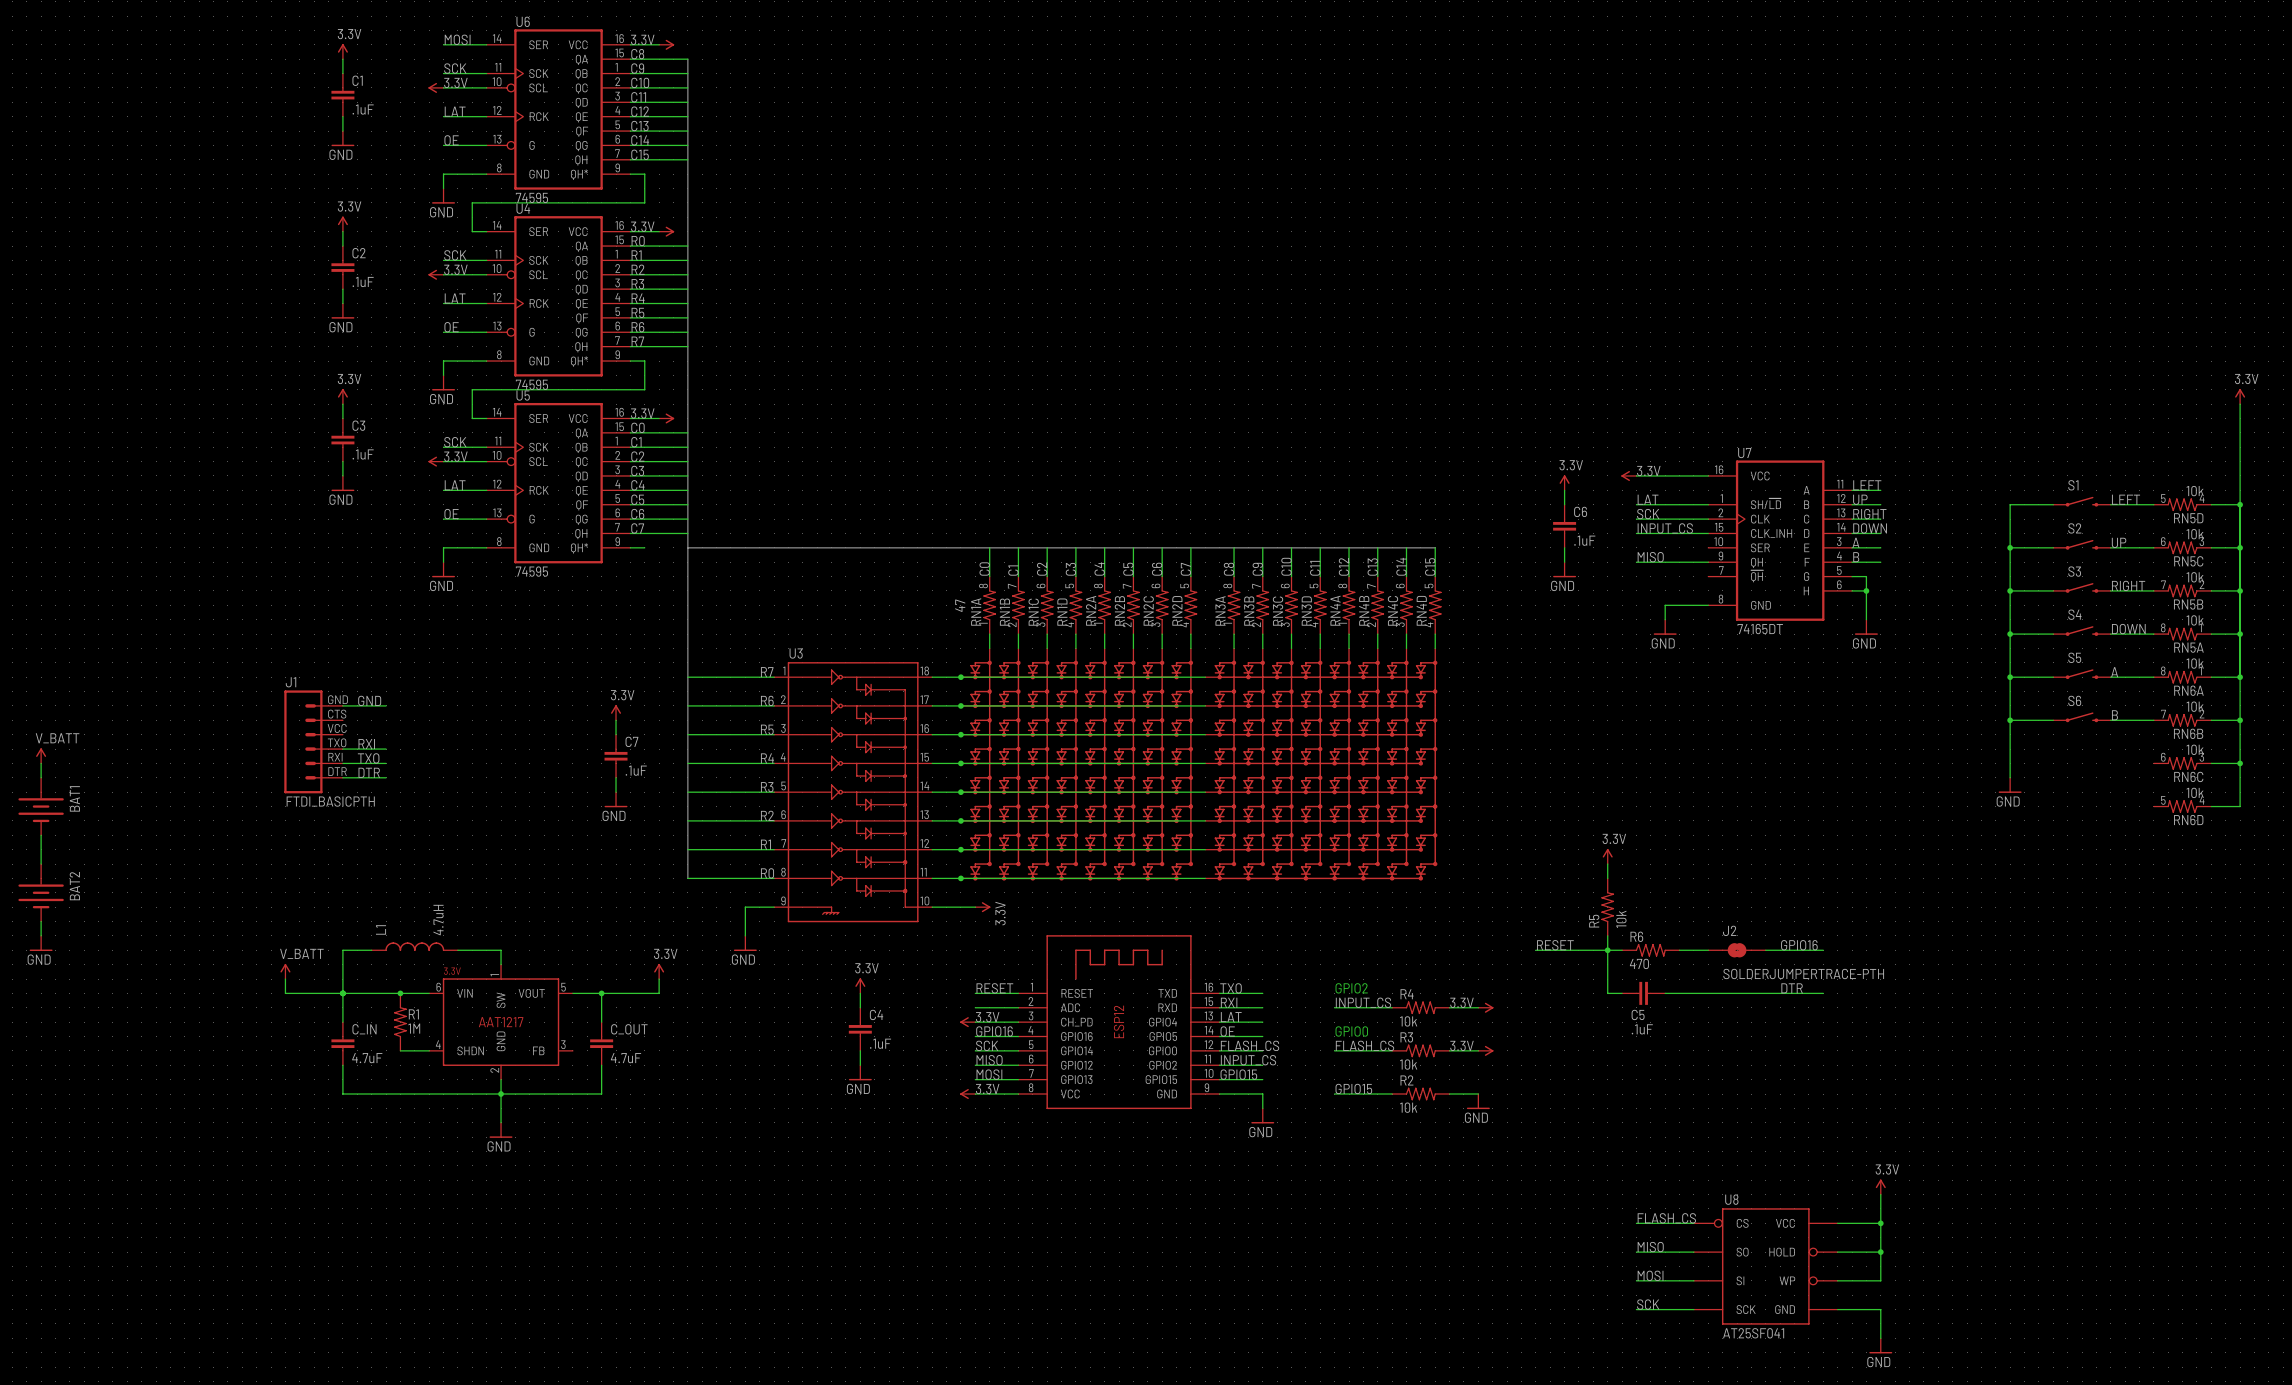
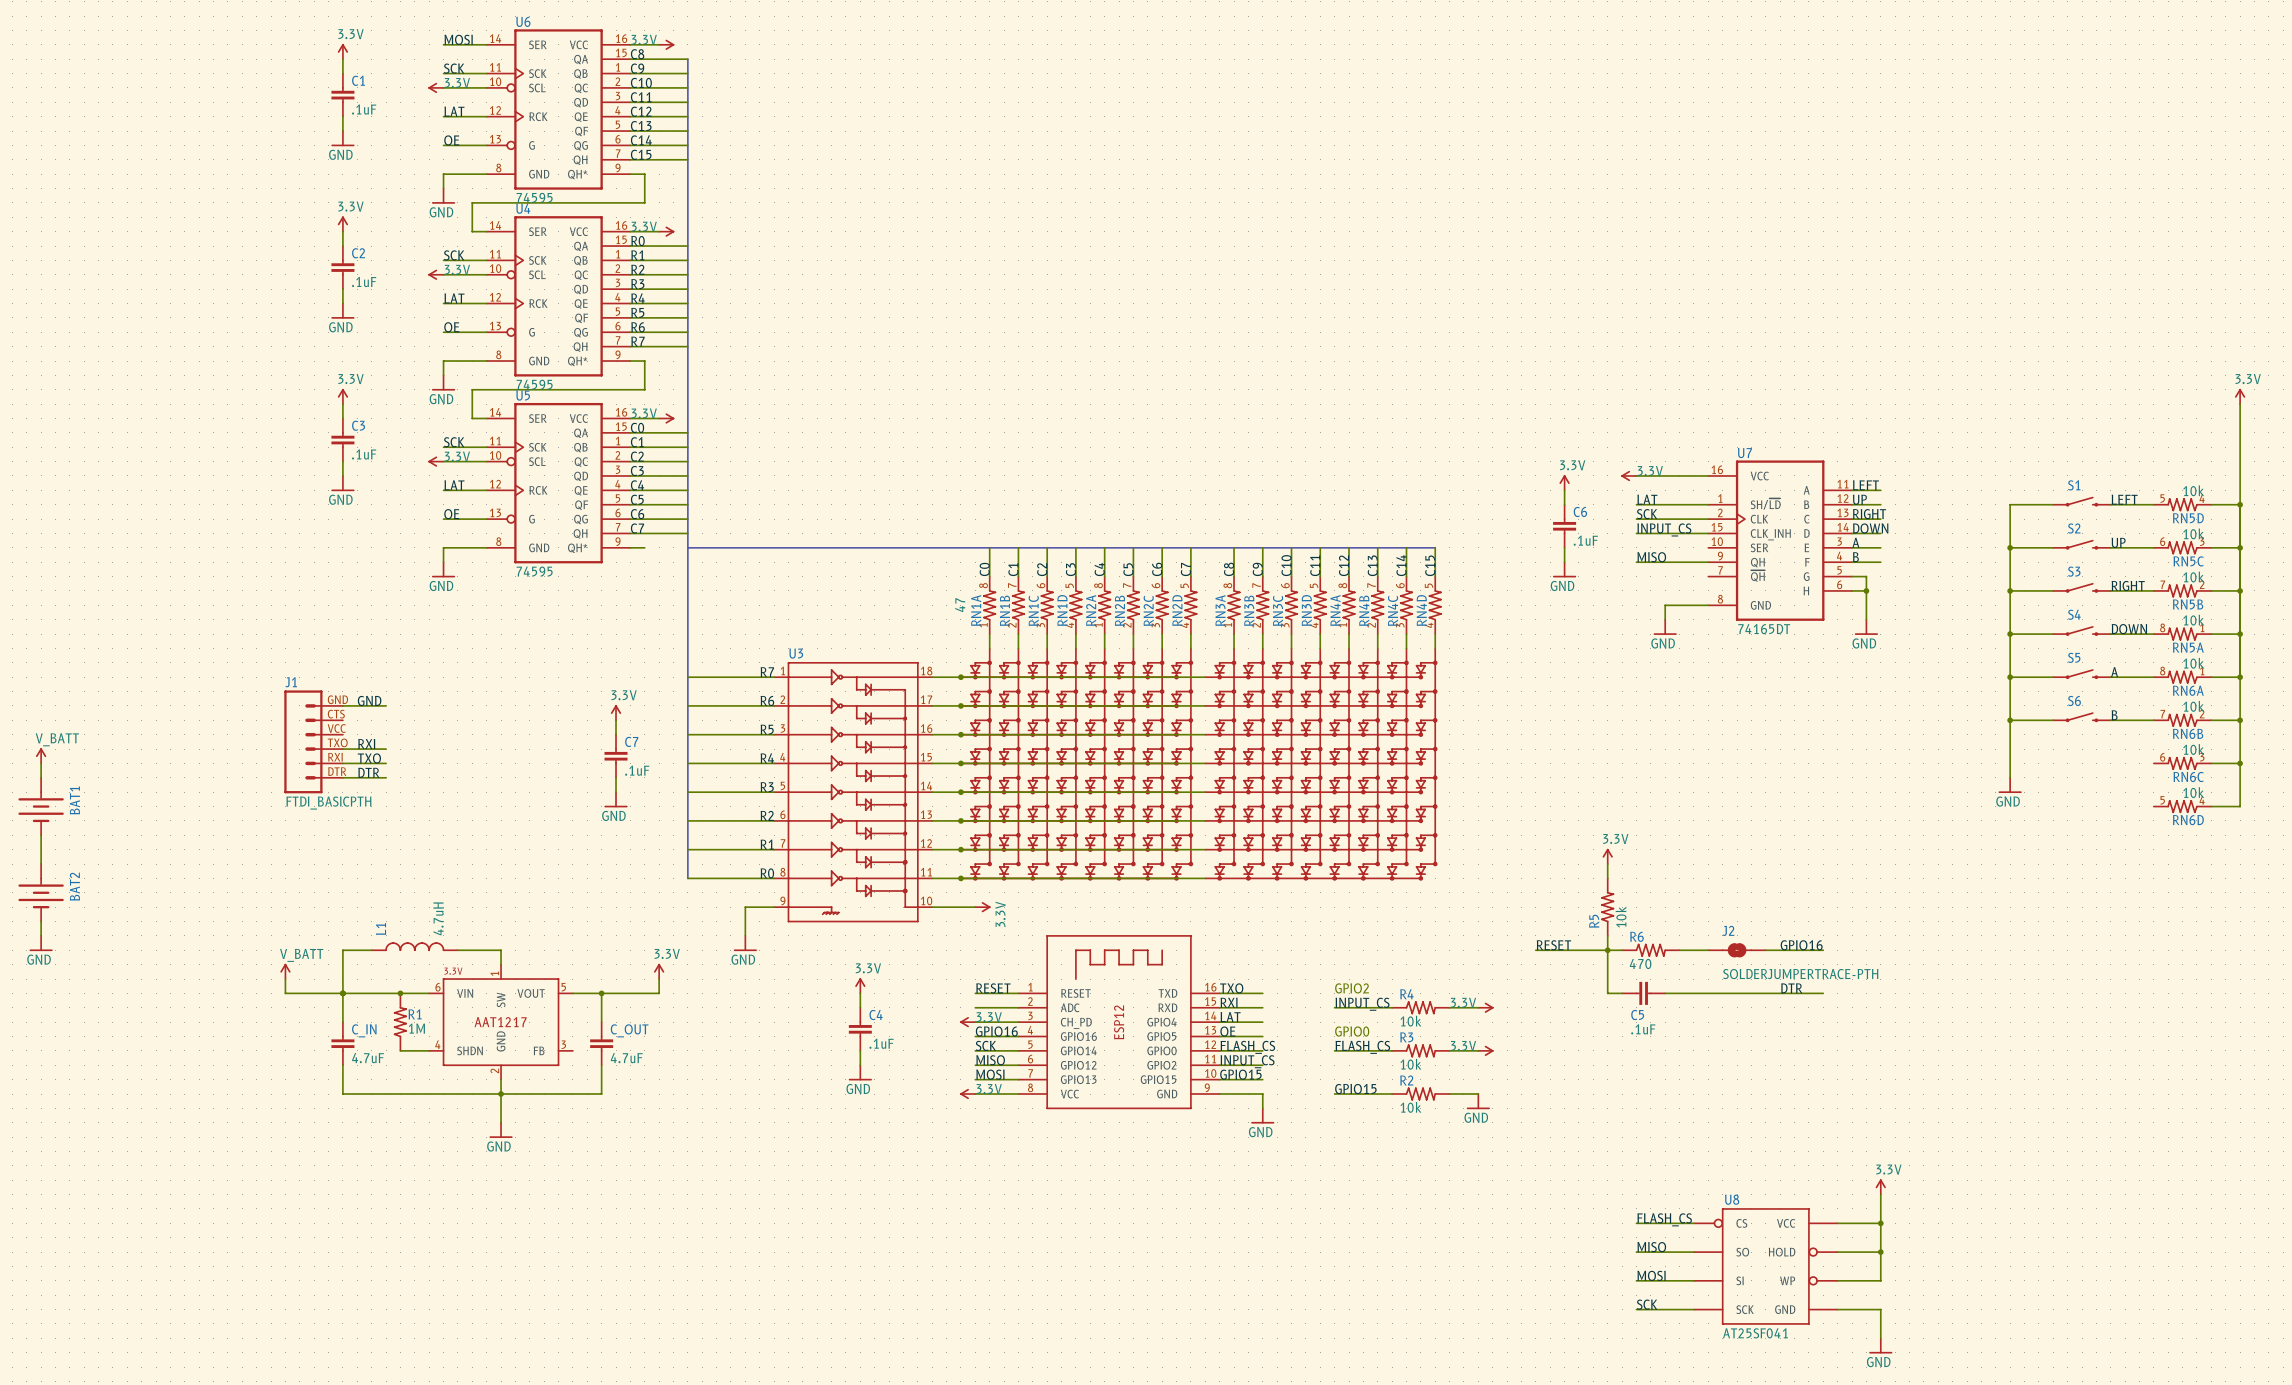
part pin number: 13 (1208, 1015) -> 14 (1210, 1015)
part pin number: 14 (1209, 1030) -> 13 (1210, 1030)

